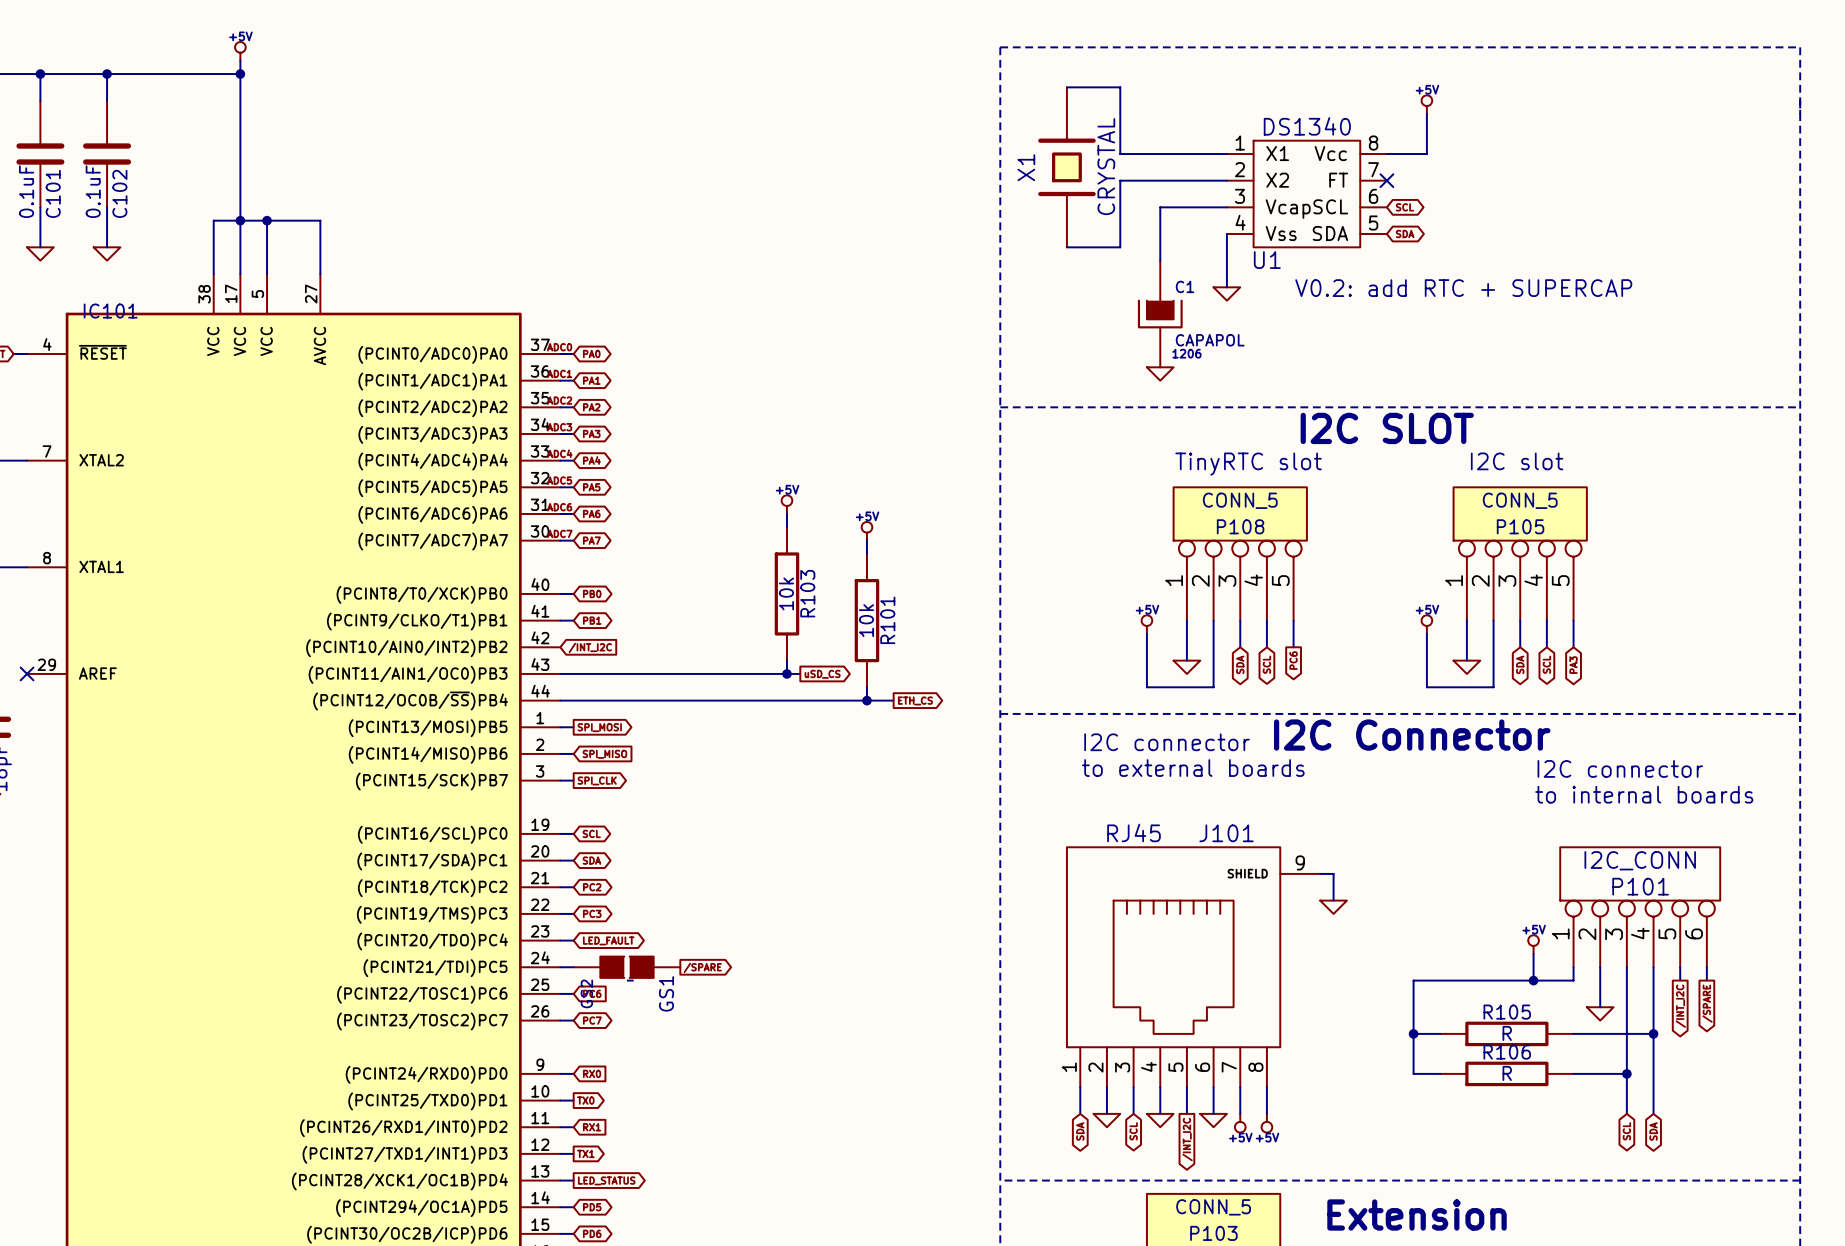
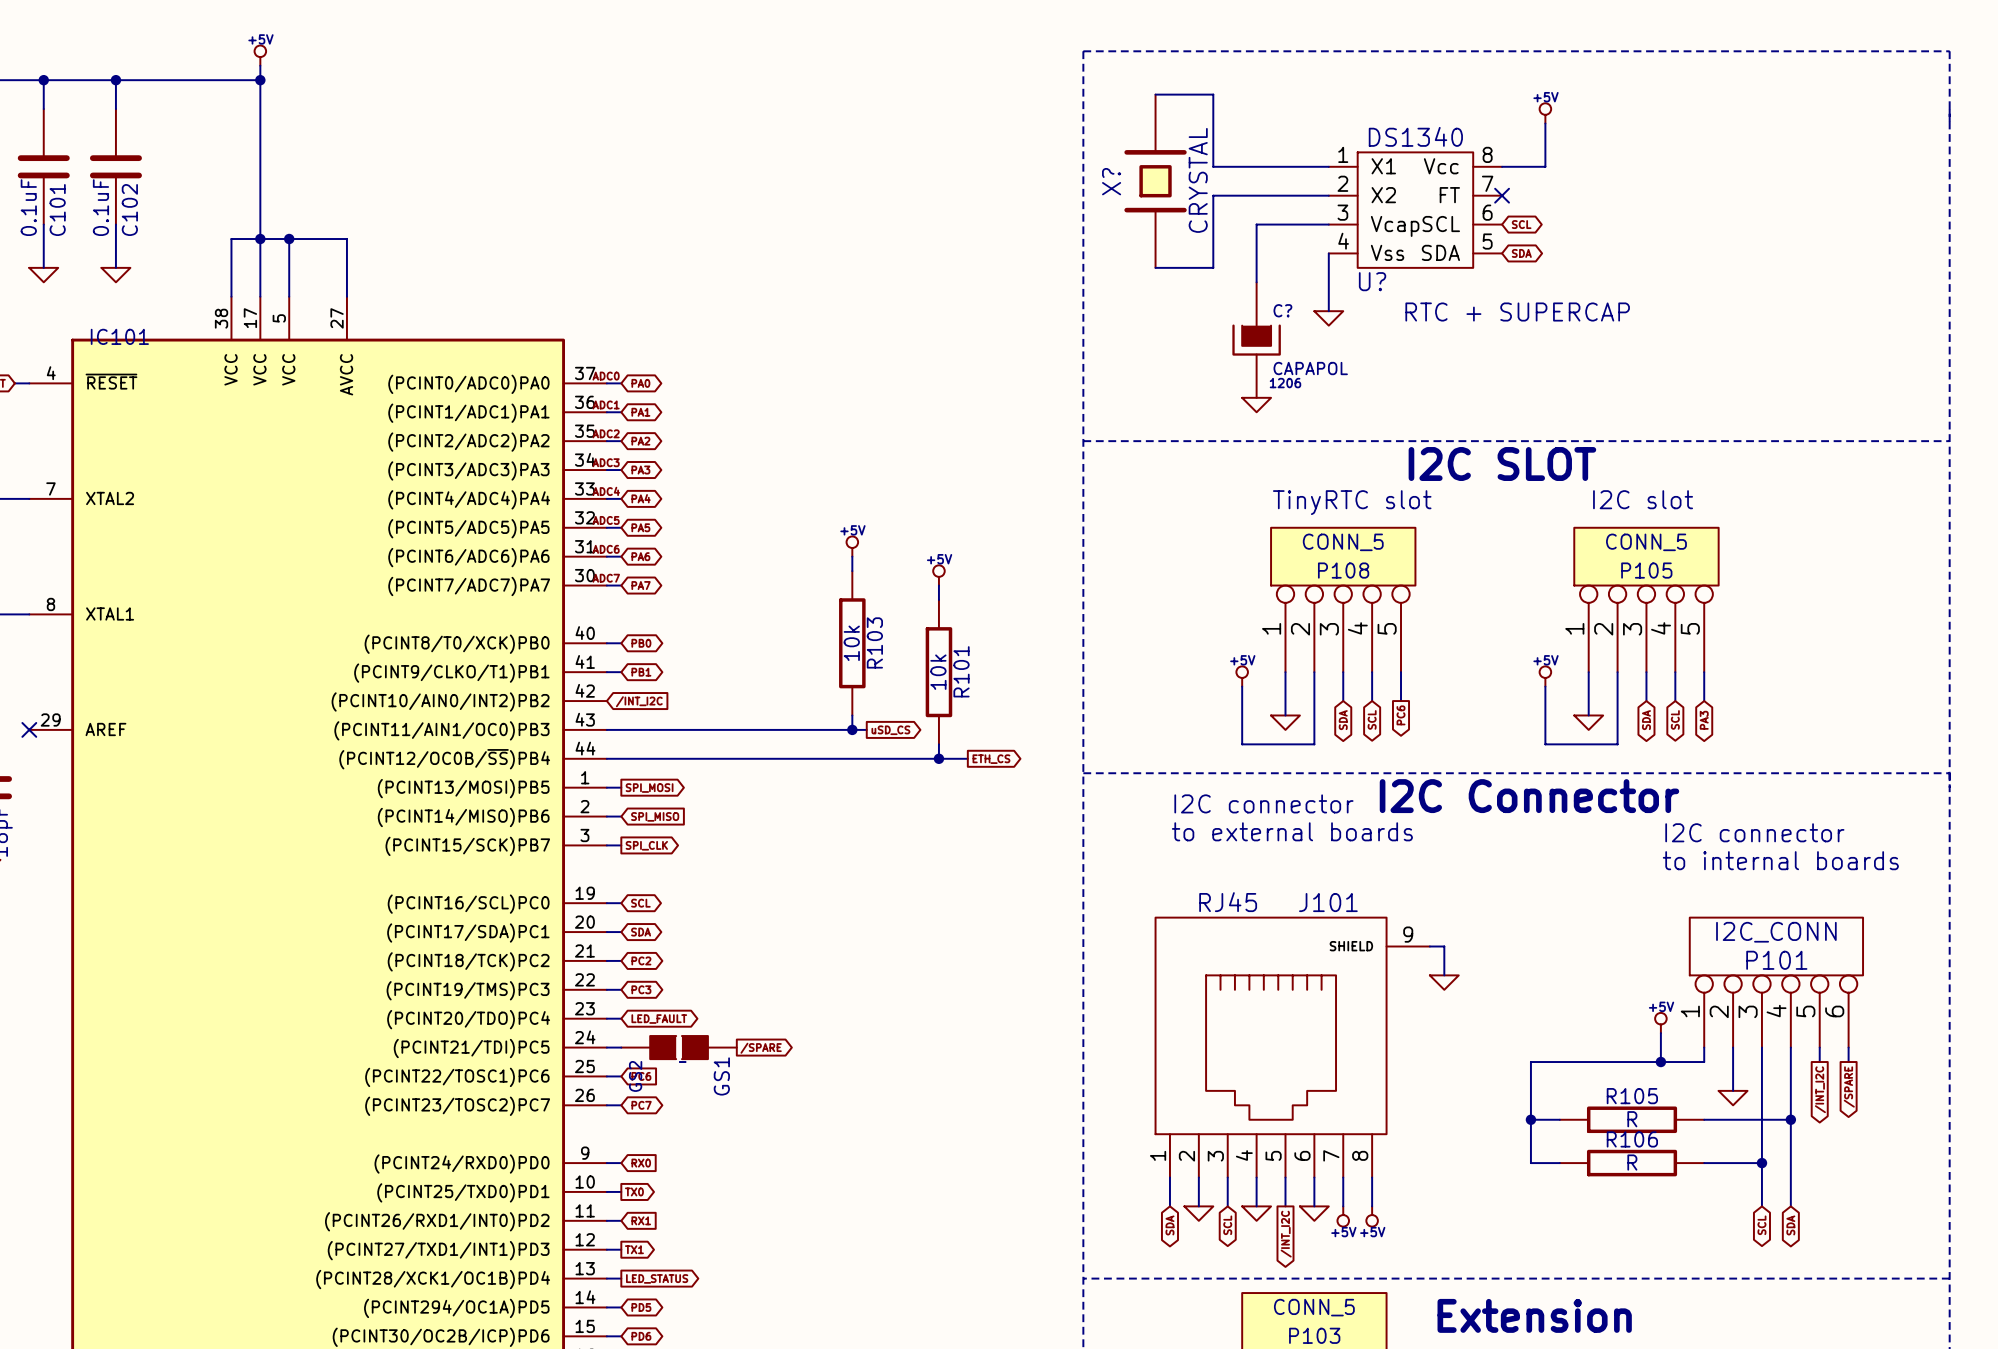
X1 name: X1 (1026, 167) -> X? (1111, 181)
U1 name: U1 (1267, 260) -> U? (1372, 281)
C1 name: C1 (1185, 286) -> C? (1282, 310)
text: V0.2: add RTC + SUPERCAP (1463, 288) -> RTC + SUPERCAP (1517, 312)

